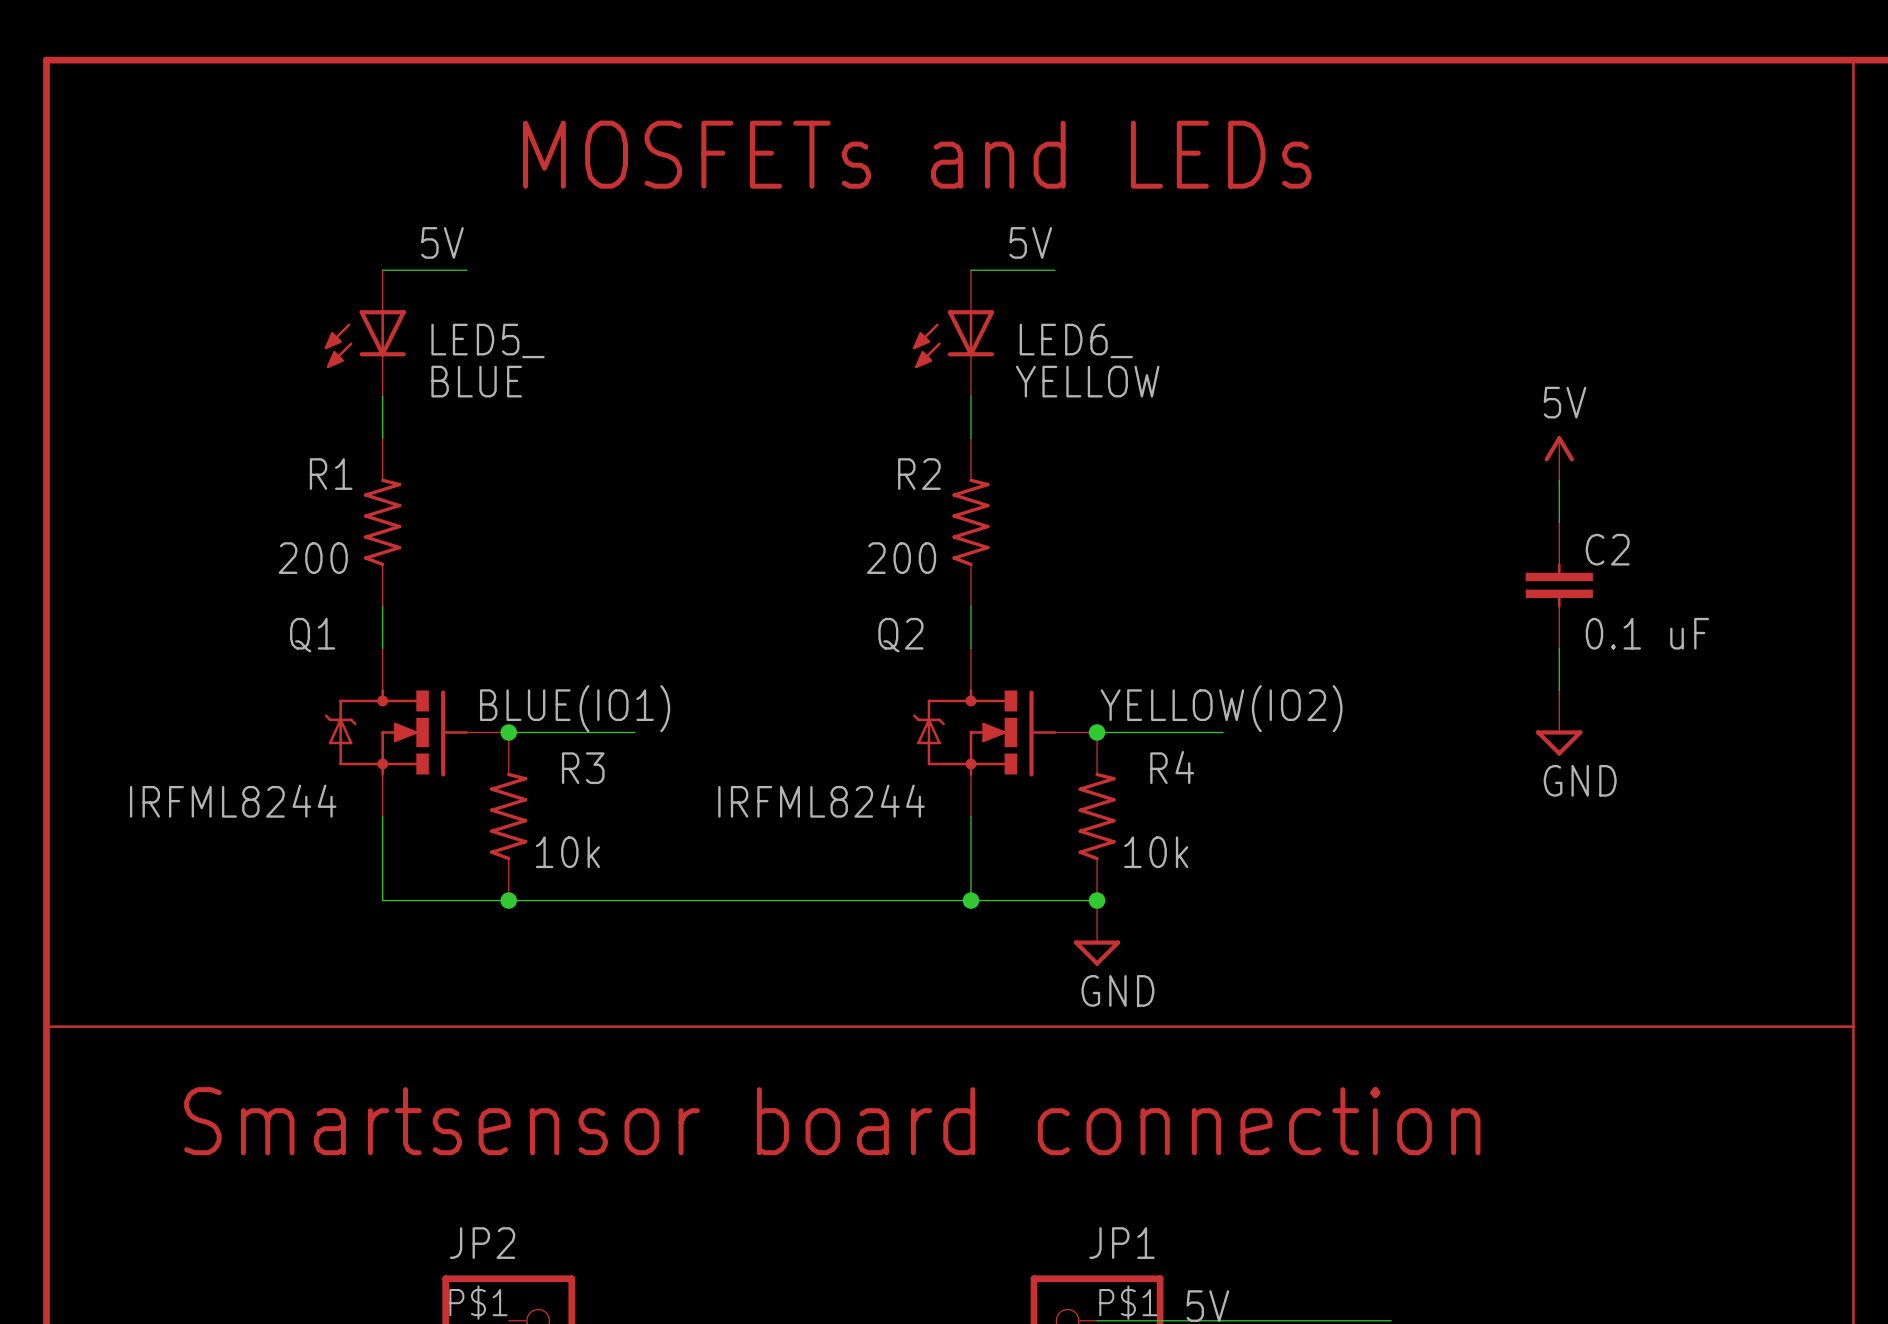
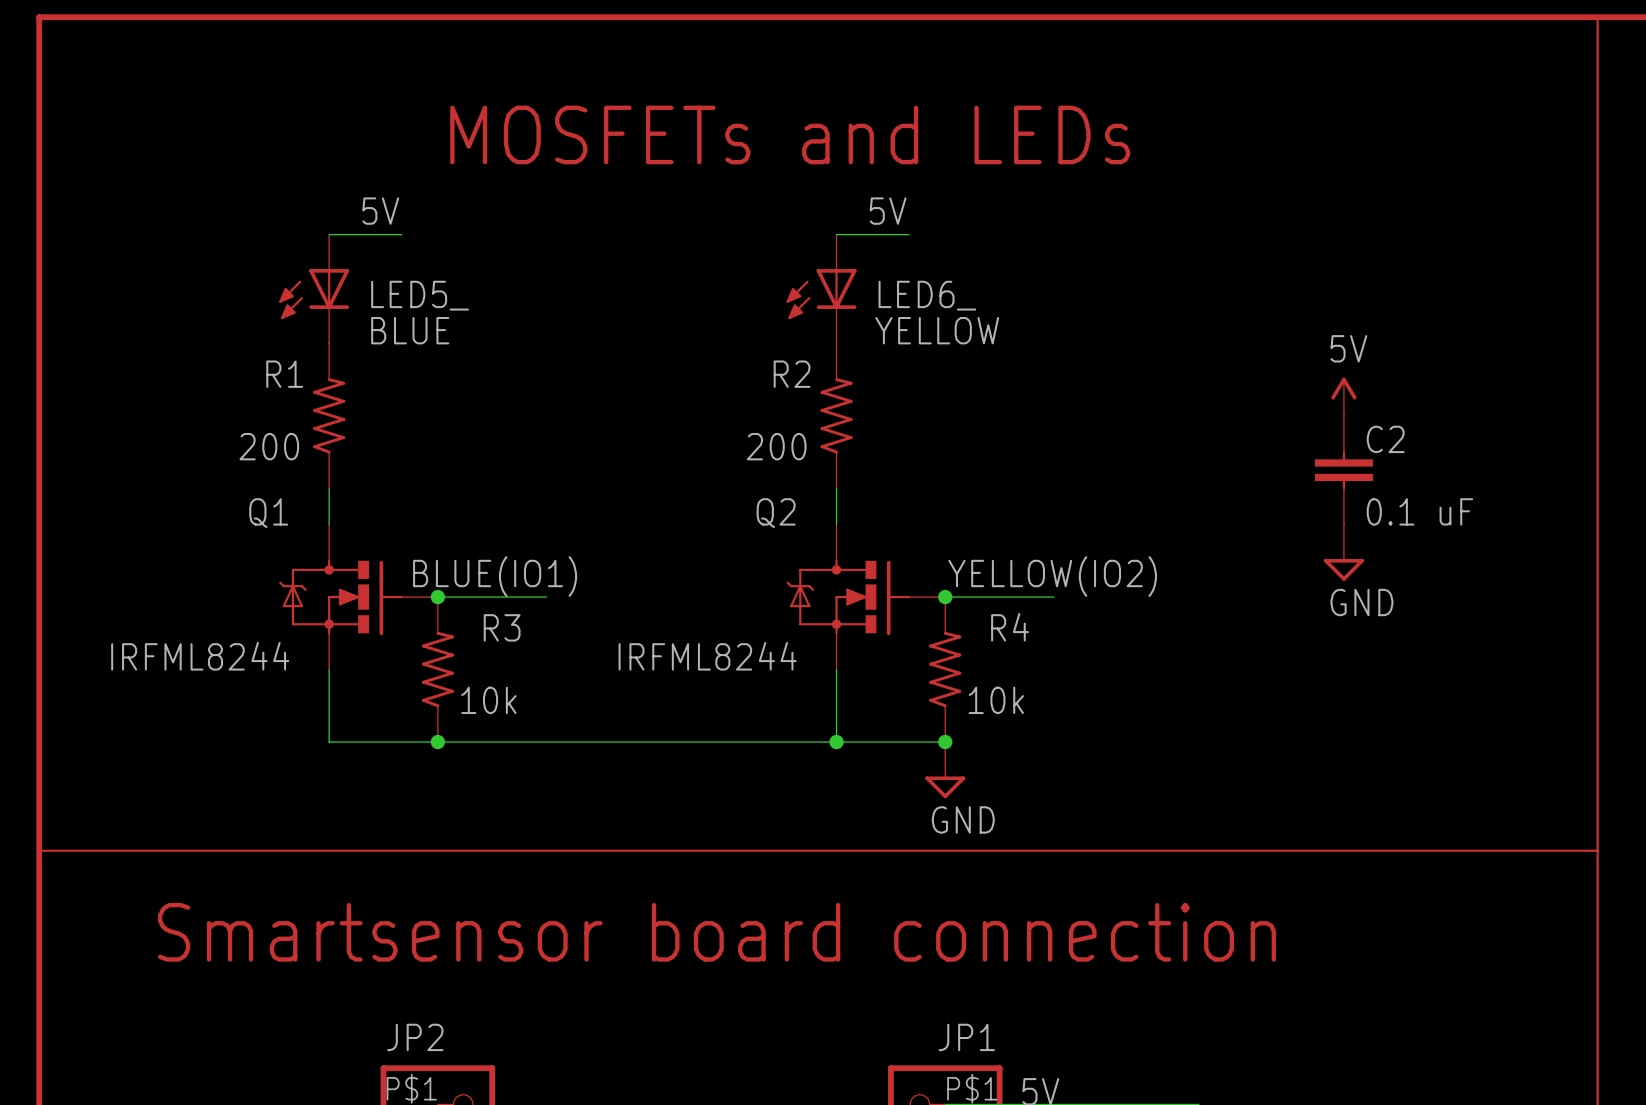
text position: MOSFETs and LEDs (917, 154) -> MOSFETs and LEDs (790, 134)
label position: 5V (442, 242) -> 5V (380, 211)
label position: 5V (1030, 242) -> 5V (888, 211)
wire: (382, 270) (466, 270) -> (329, 234) (401, 234)
wire: (970, 270) (1055, 270) -> (836, 234) (909, 234)
LED5_ position: (365, 333) -> (314, 289)
LED6_ position: (953, 333) -> (821, 289)
power symbol position: 5V (1559, 458) -> 5V (1343, 396)
power symbol position: GND (1559, 723) -> GND (1343, 552)

